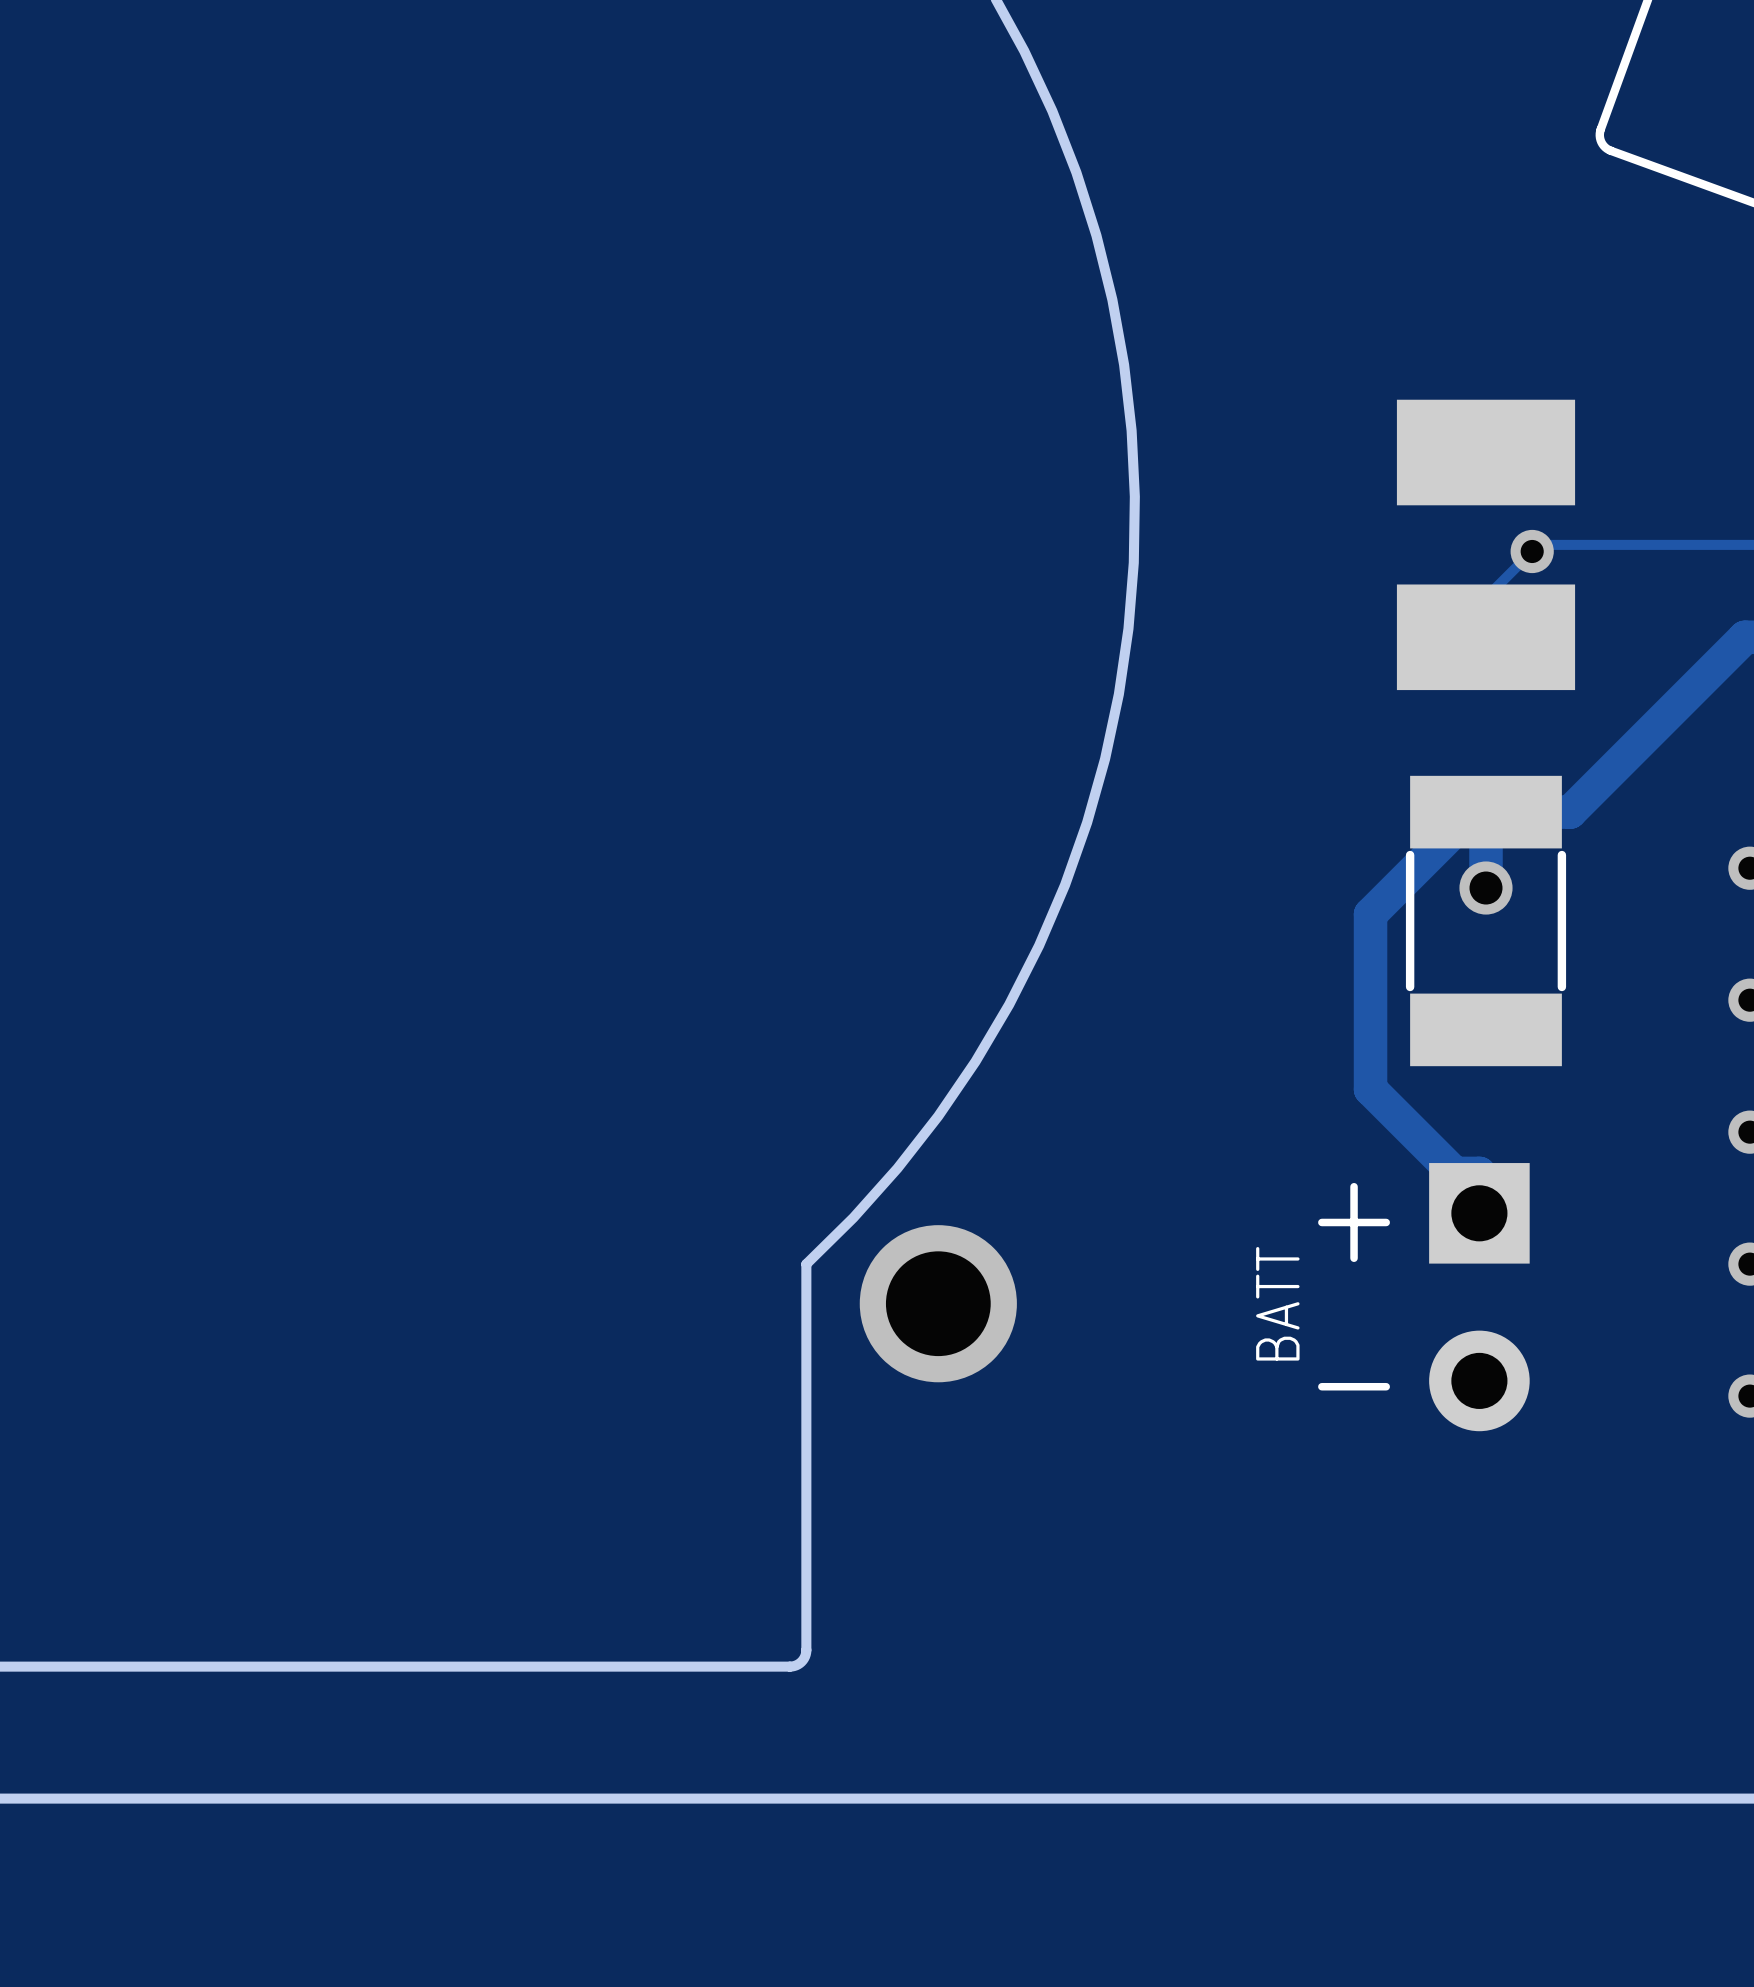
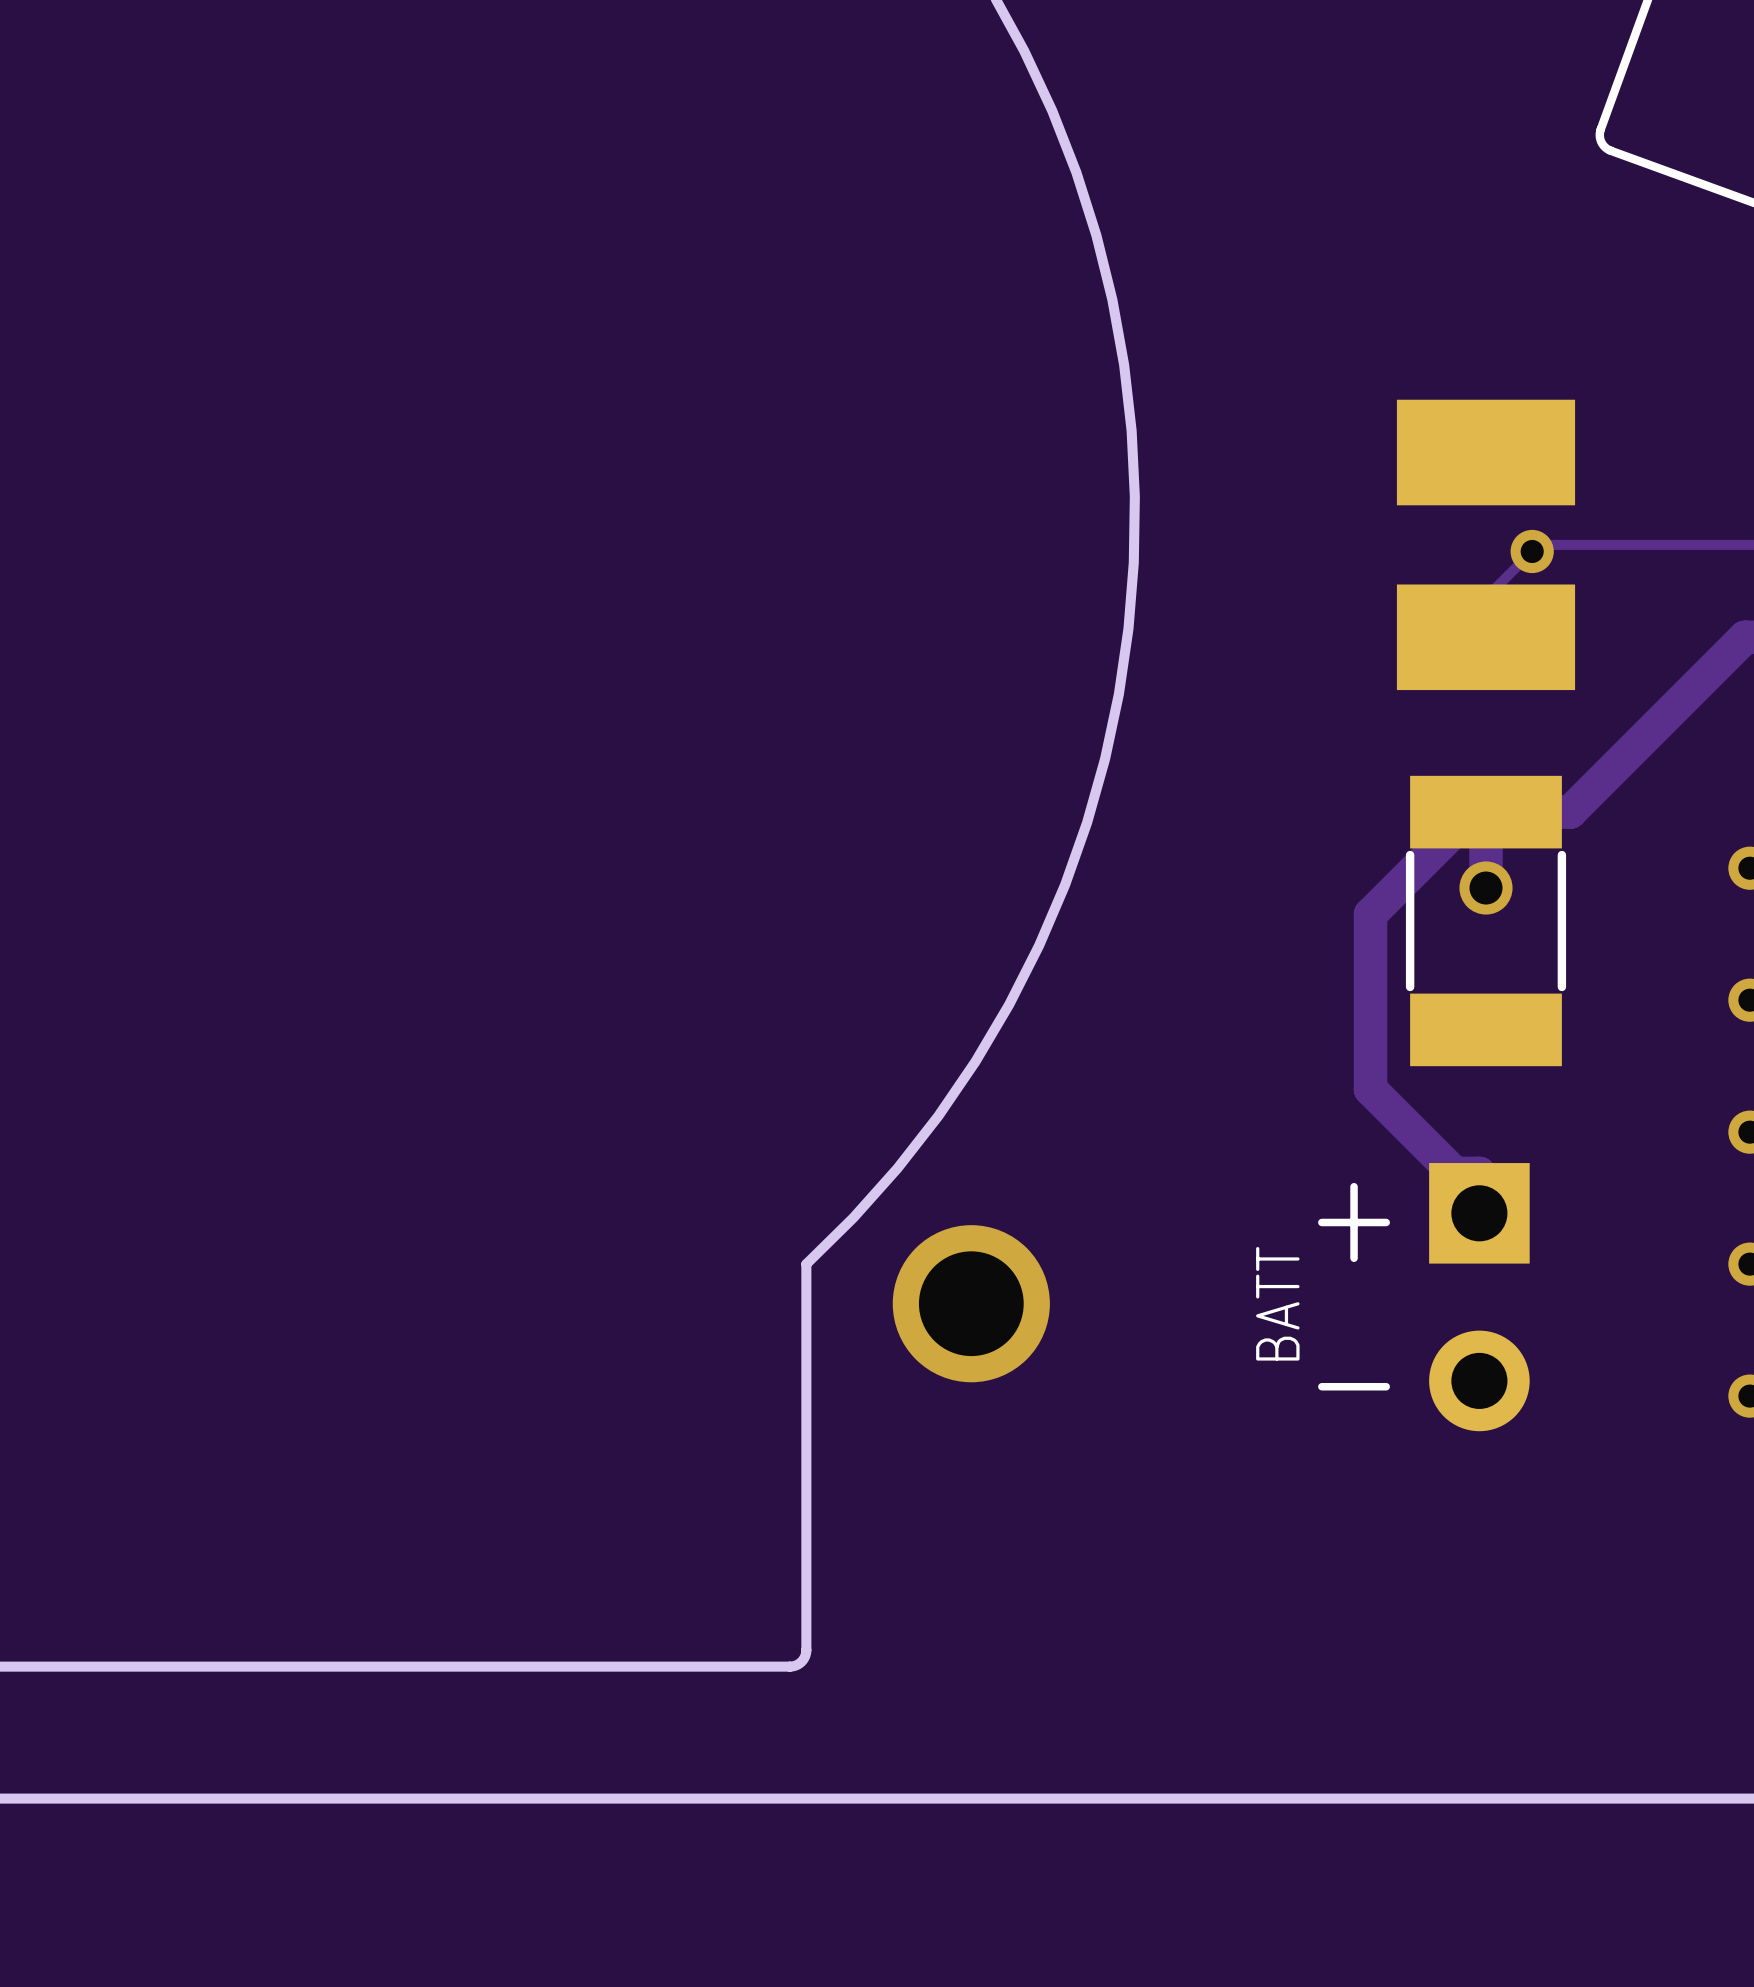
via position: (938, 1303) -> (971, 1303)

